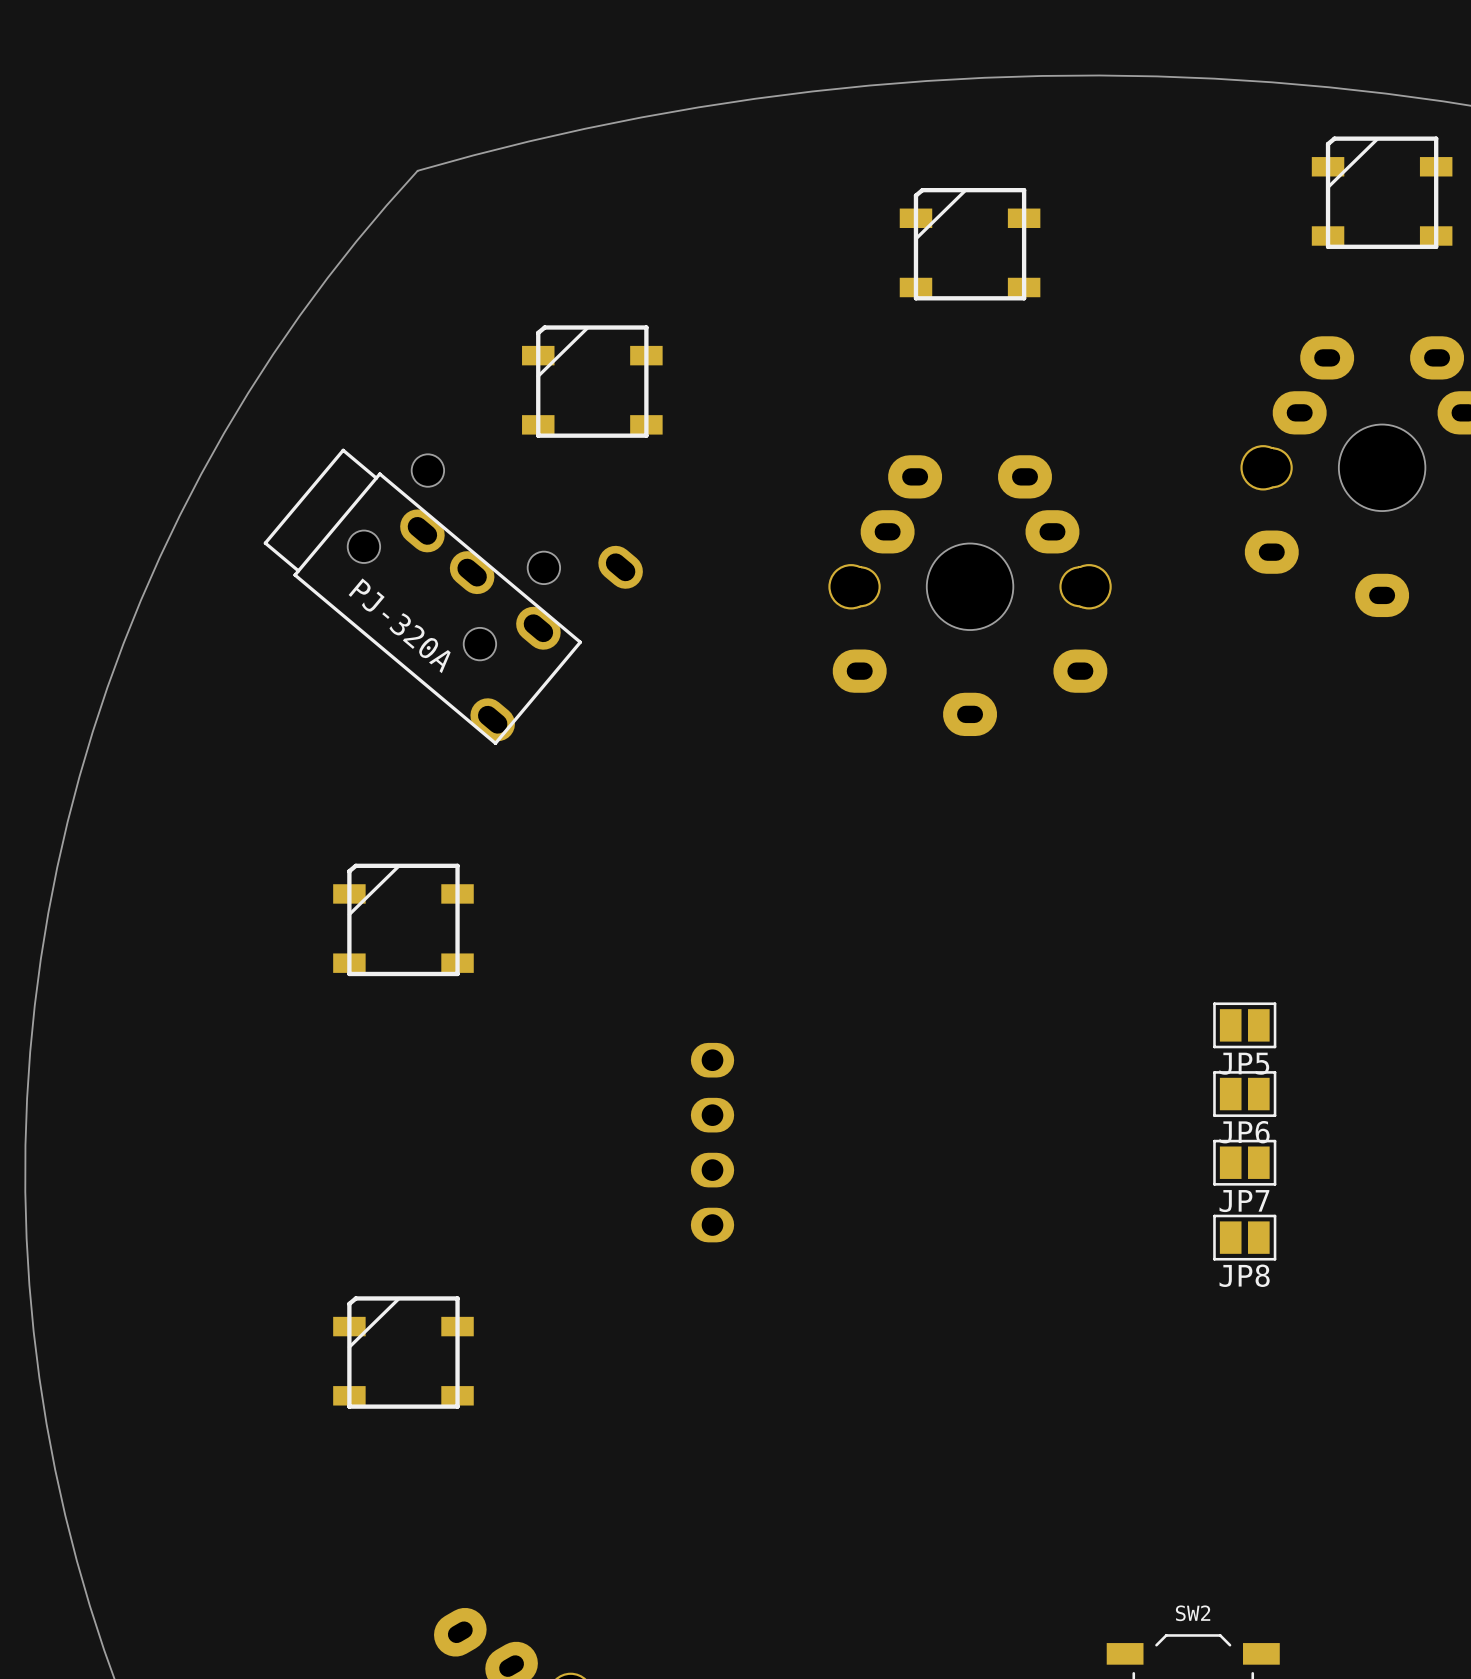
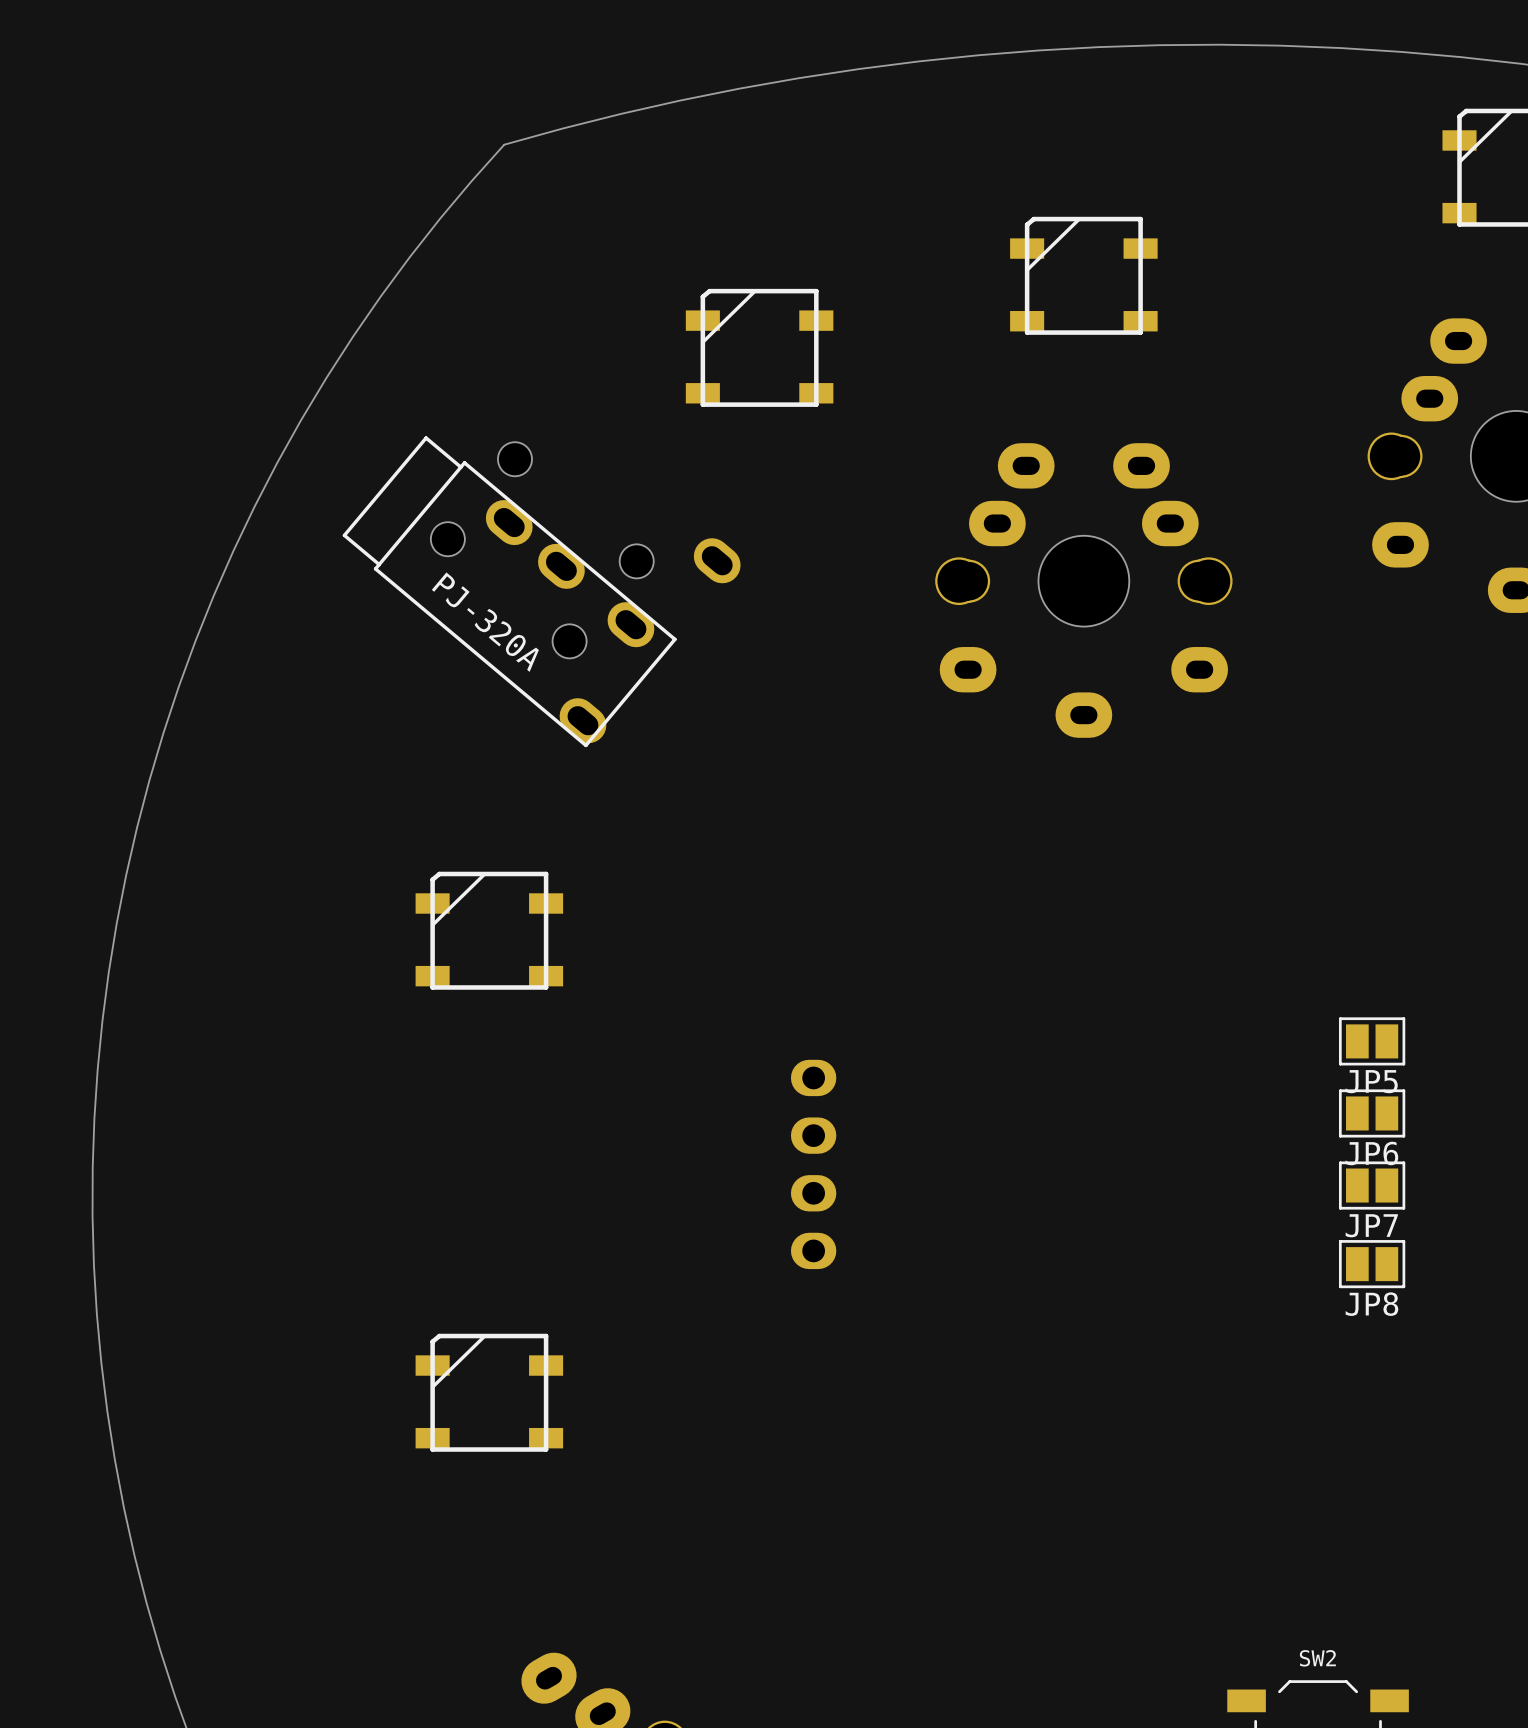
part position: (970, 244) -> (1083, 275)
part position: (592, 381) -> (759, 347)
part footprint: [333, 1296, 474, 1409] -> [415, 1333, 564, 1452]

